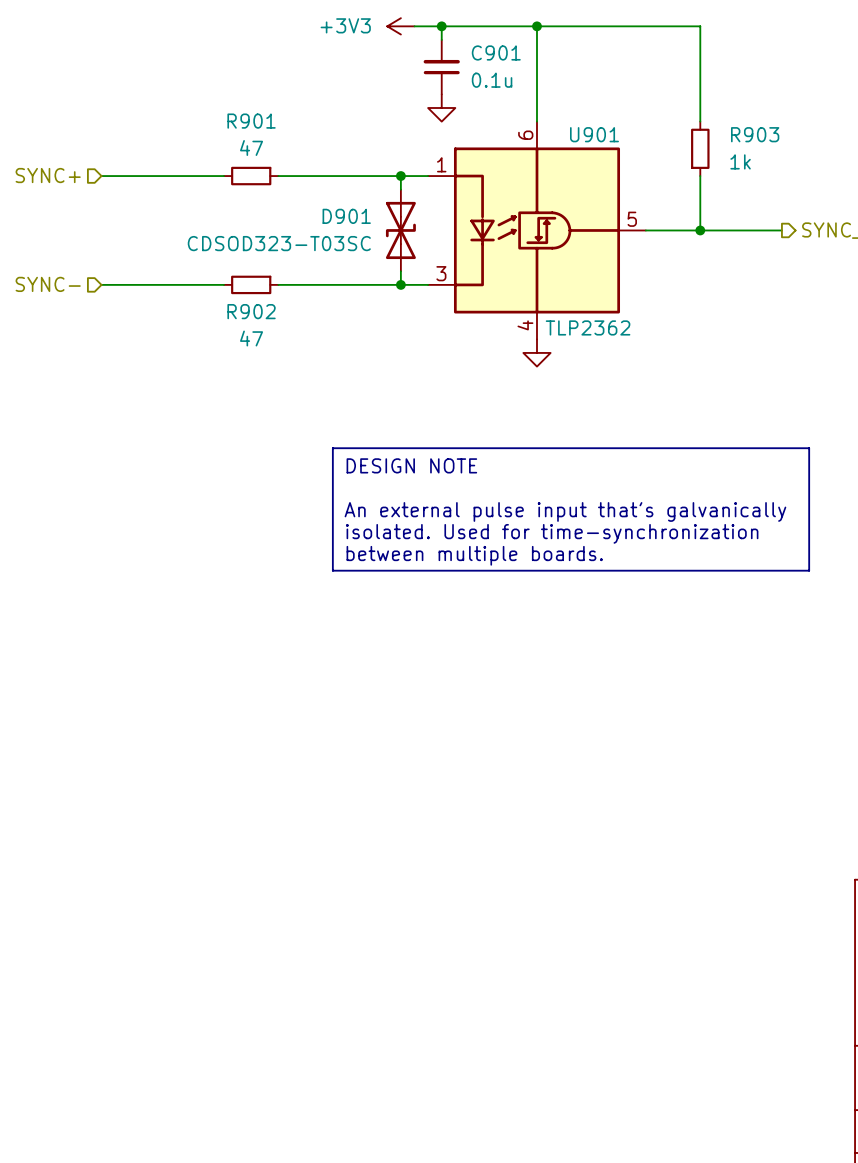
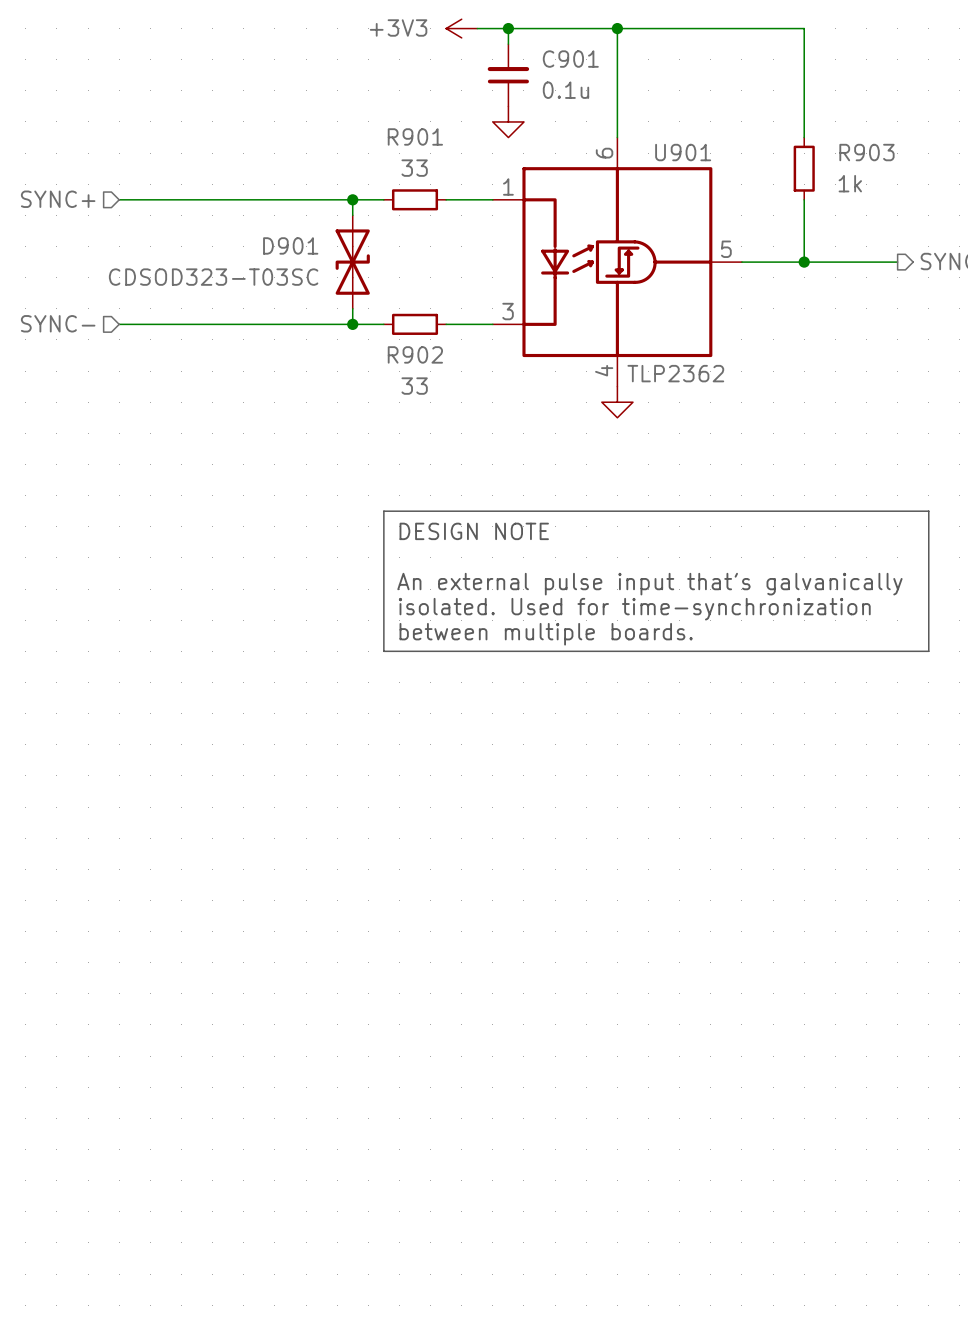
R901 value: 47 (251, 147) -> 33 (414, 168)
R901 position: (251, 176) -> (415, 199)
junction: none -> (352, 199)
wire: (332, 176) (387, 176) -> (259, 199) (321, 199)
wire: (400, 176) (400, 189) -> (352, 199) (352, 215)
junction: (400, 176) -> none
D901 position: (400, 230) -> (352, 262)
wire: (400, 271) (400, 284) -> (352, 308) (352, 324)
R902 position: (251, 284) -> (415, 324)
junction: none -> (352, 324)
wire: (332, 284) (387, 284) -> (259, 324) (321, 324)
junction: (400, 284) -> none
R902 value: 47 (251, 338) -> 33 (414, 386)

